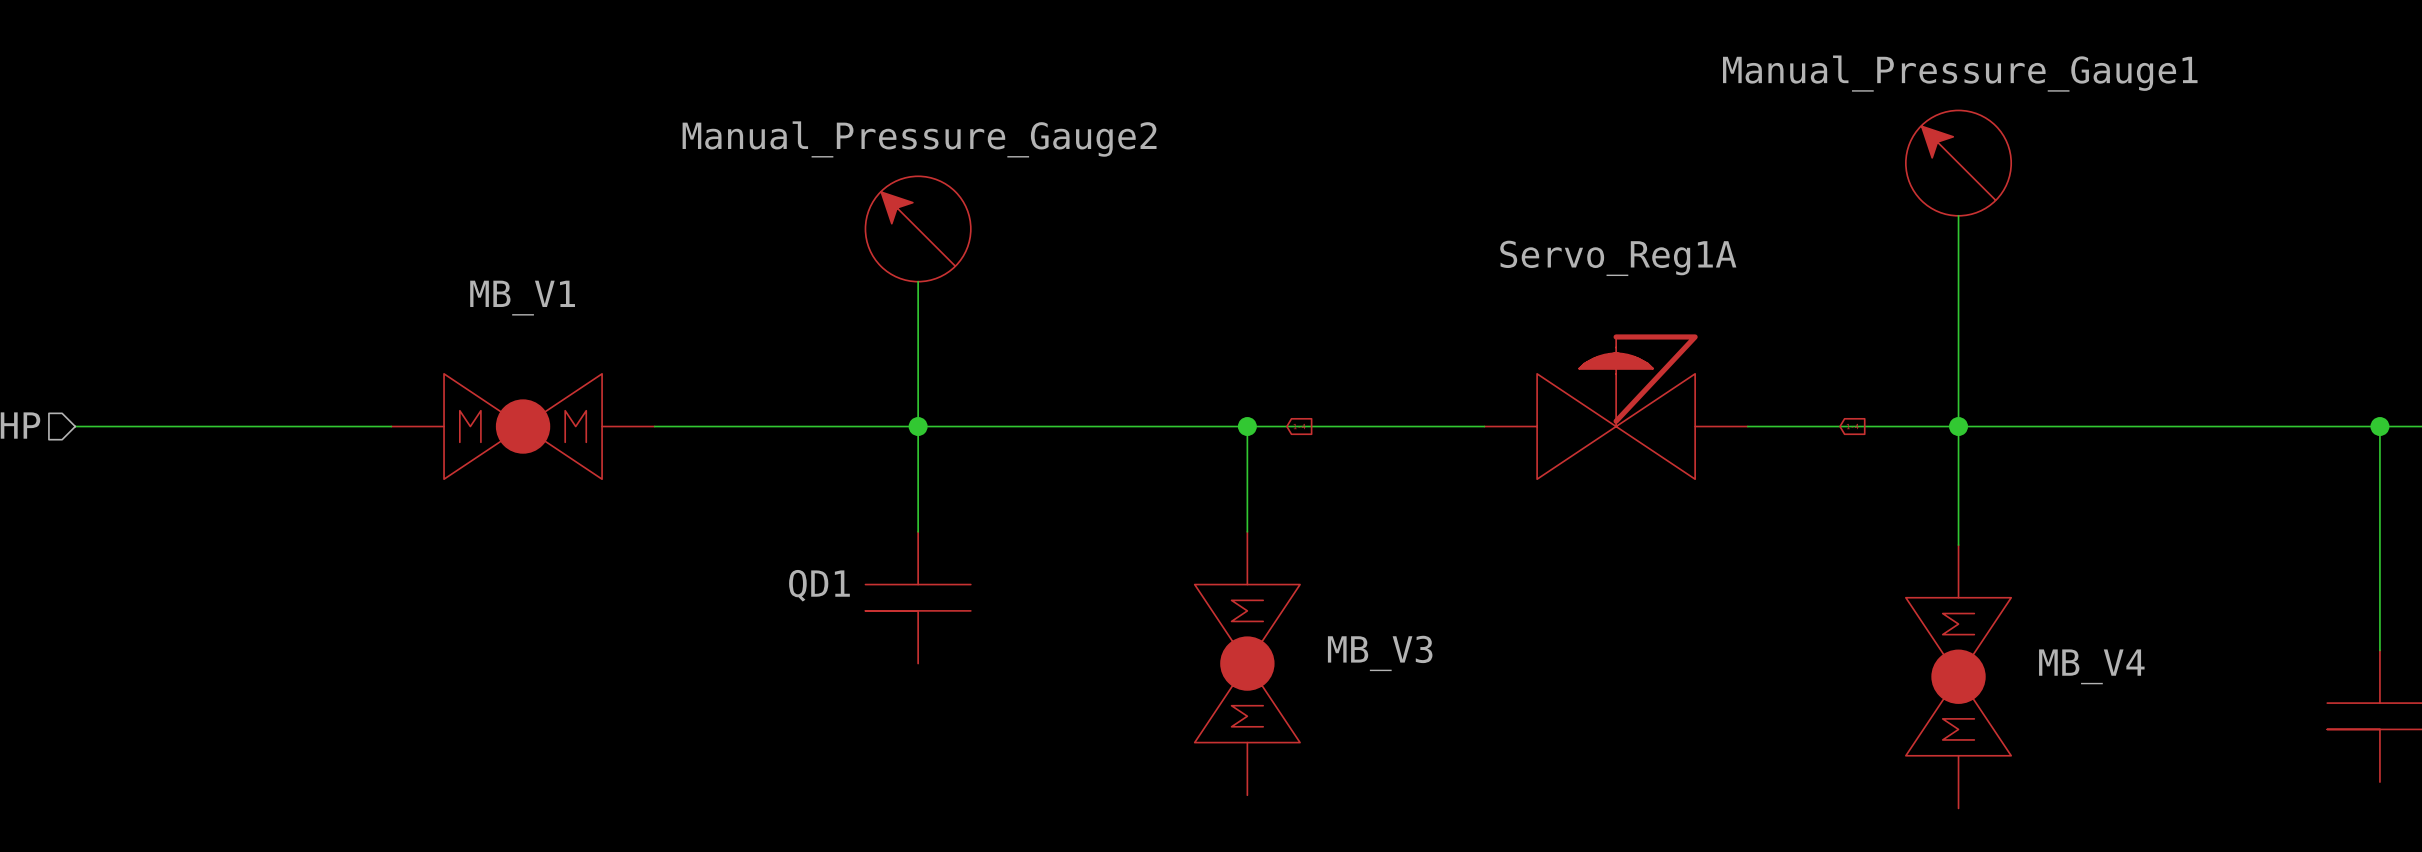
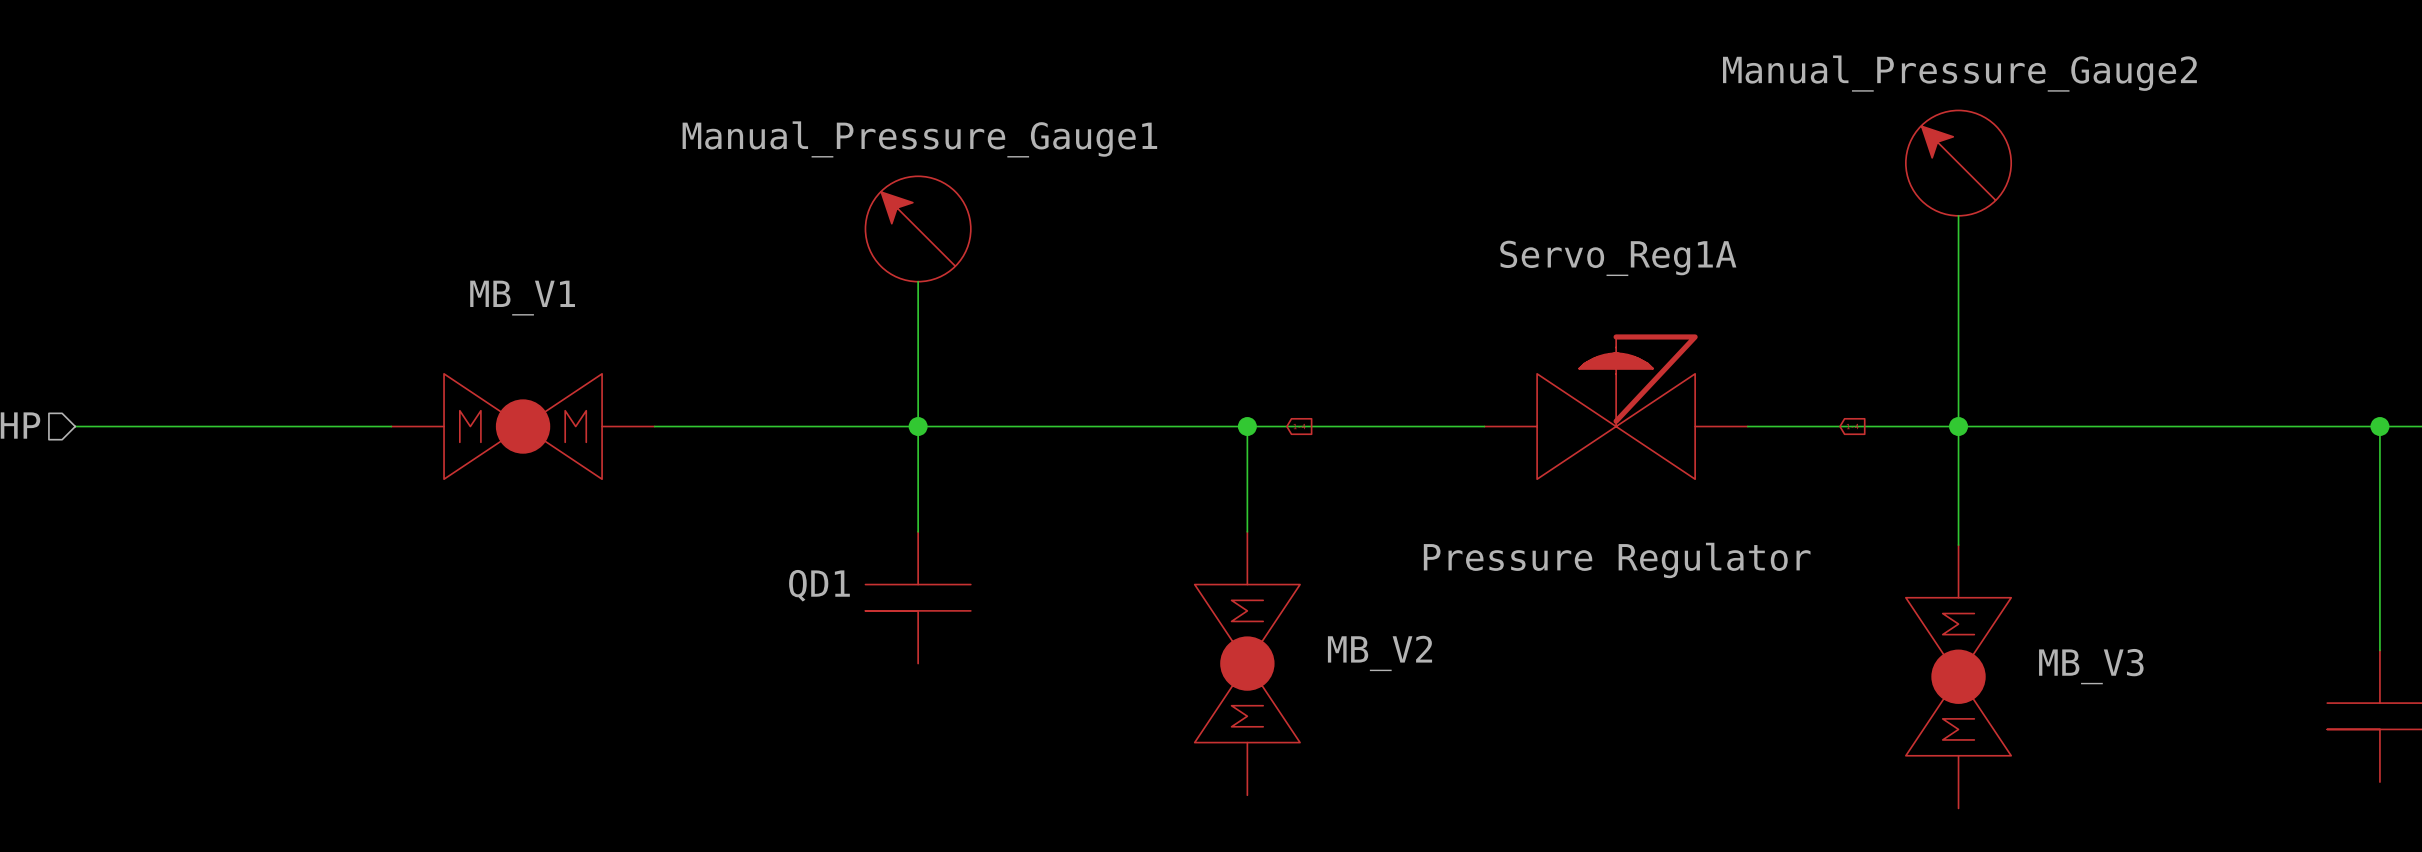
Manual_Pressure_Gauge1 name: Manual_Pressure_Gauge1 (1960, 73) -> Manual_Pressure_Gauge2 (1959, 73)
Manual_Pressure_Gauge2 name: Manual_Pressure_Gauge2 (919, 139) -> Manual_Pressure_Gauge1 (919, 139)
Servo_Reg1A text: none -> Pressure Regulator (1617, 560)
MB_V3 name: MB_V3 (1380, 653) -> MB_V2 (1379, 653)
MB_V4 name: MB_V4 (2091, 666) -> MB_V3 (2091, 666)

